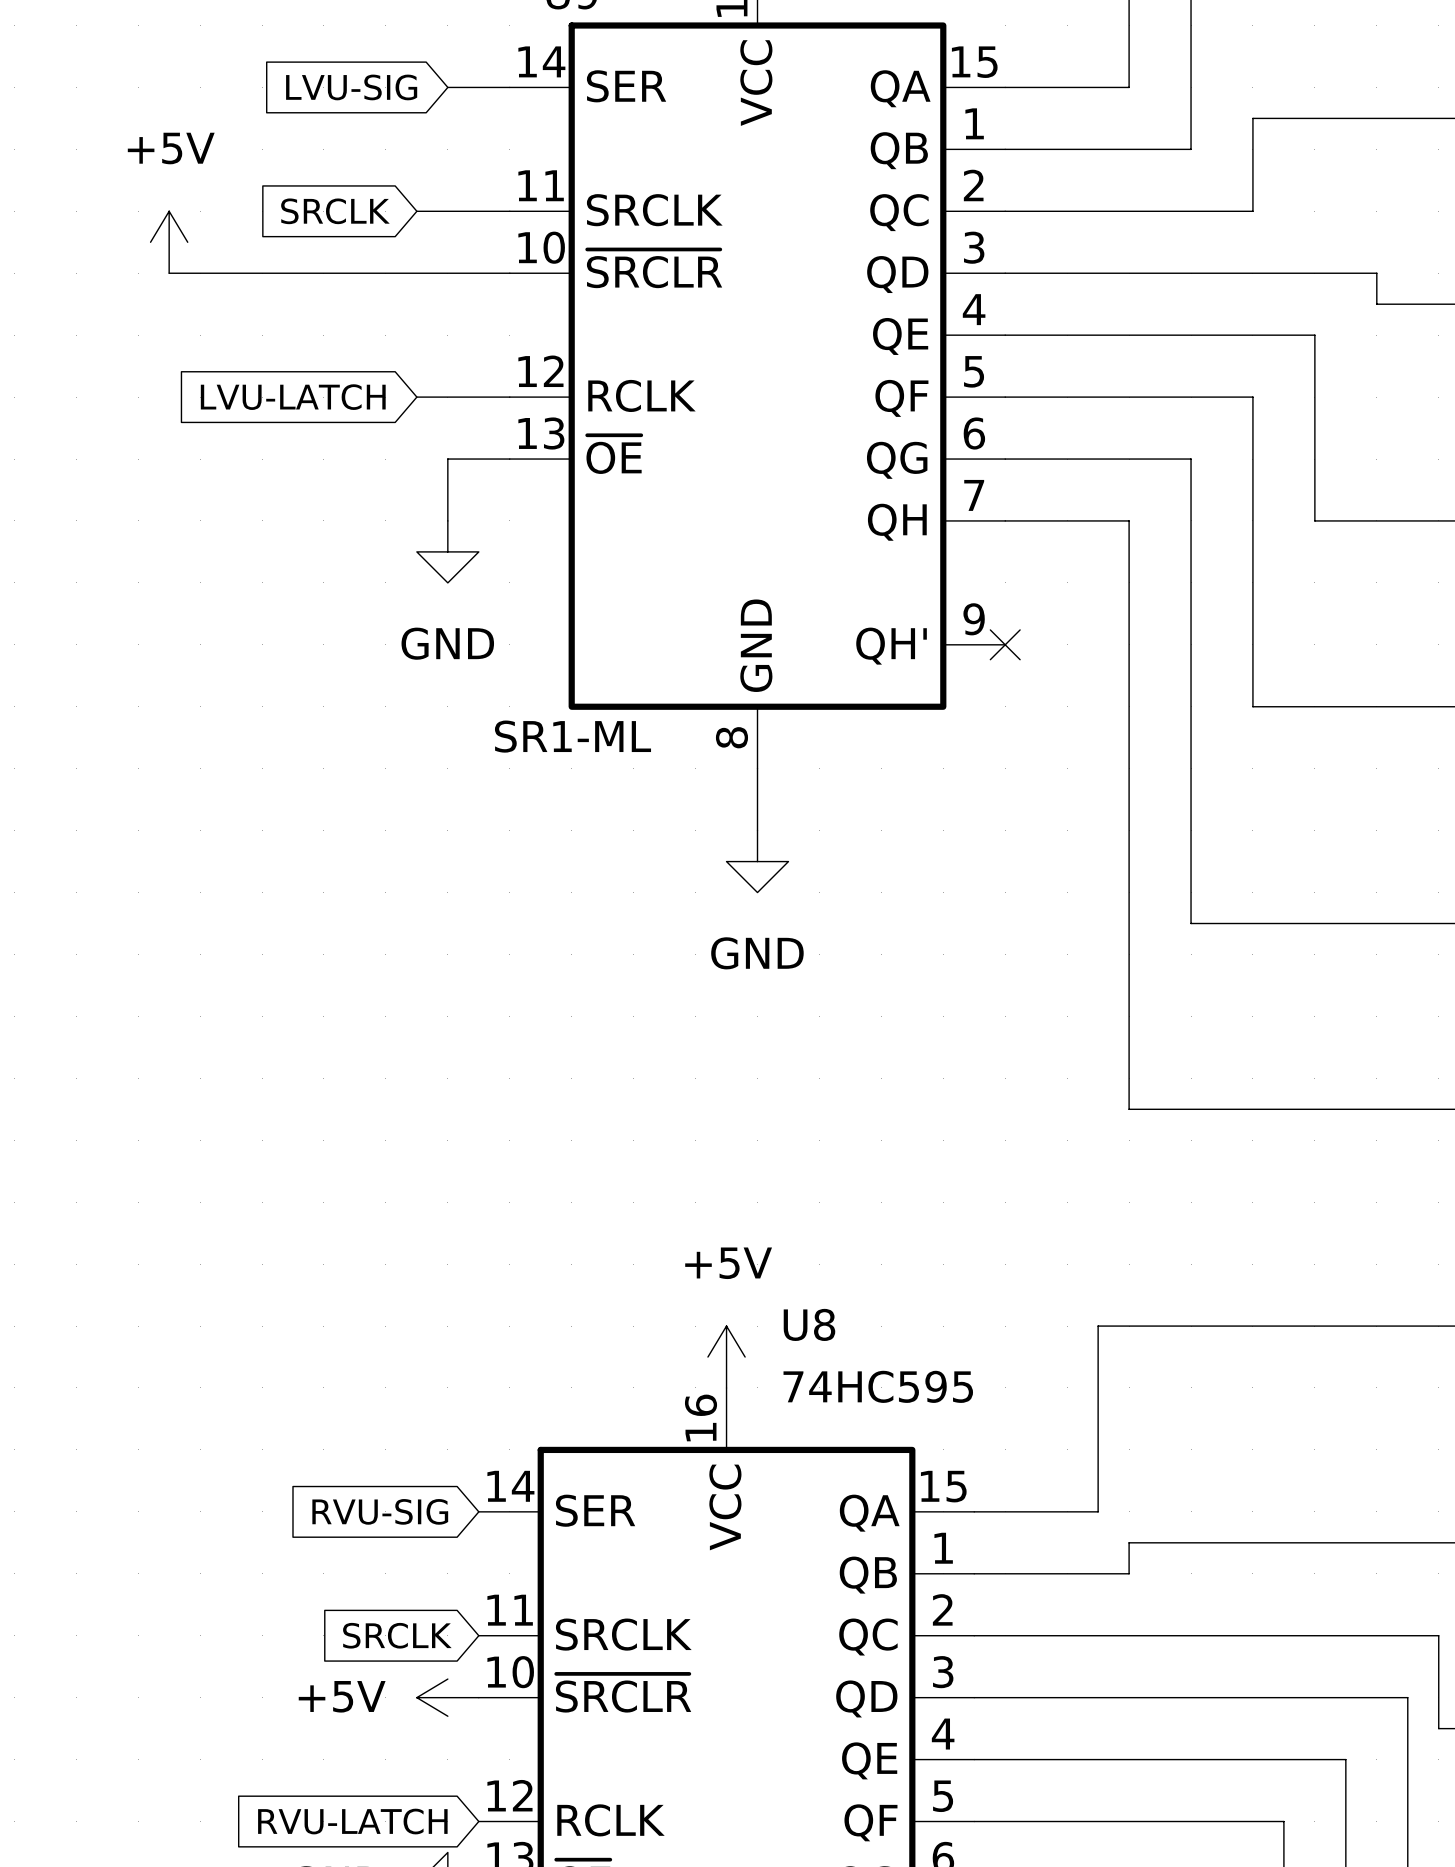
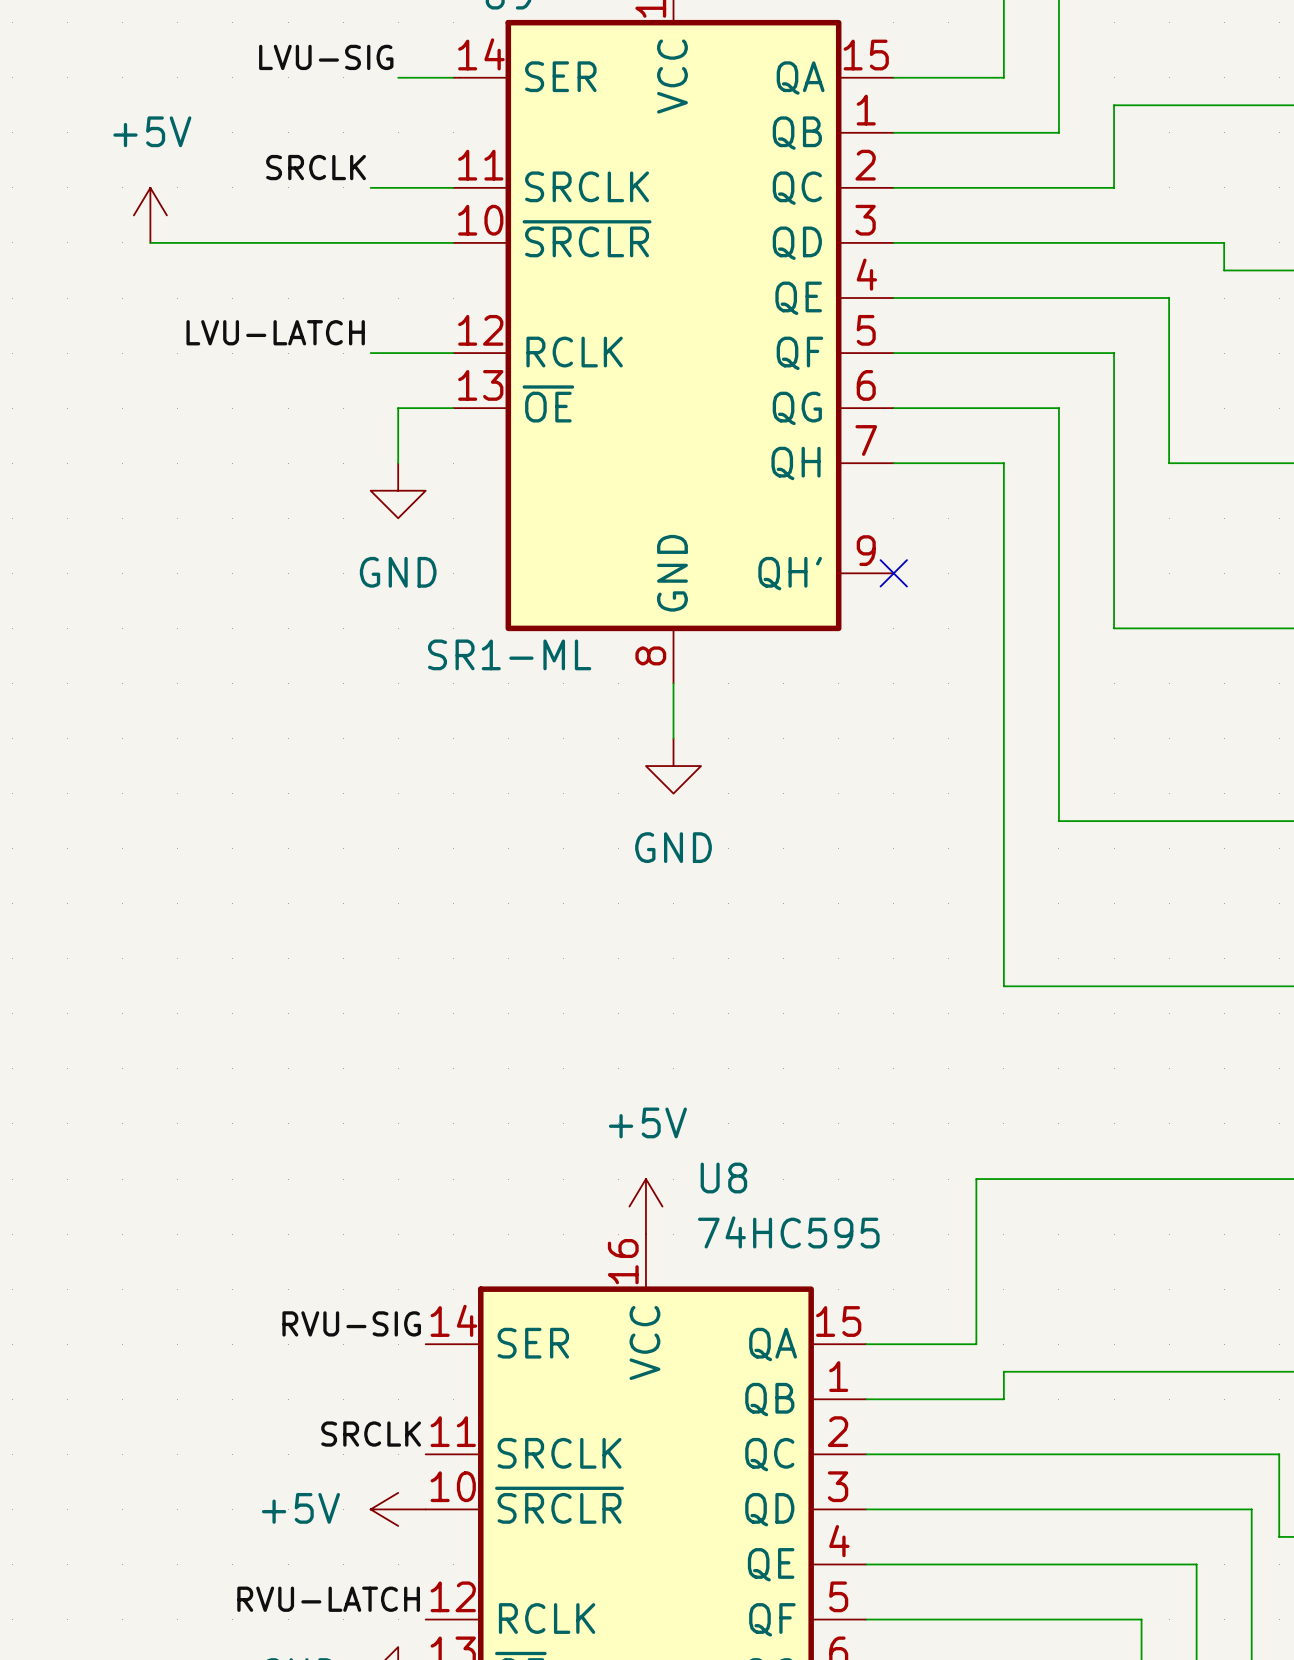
label: none -> LVU-SIG (326, 57)
global label: LVU-SIG (351, 87) -> none
label: none -> SRCLK (316, 167)
global label: SRCLK (335, 211) -> none
label: none -> LVU-LATCH (275, 332)
global label: LVU-LATCH (293, 397) -> none
label: none -> RVU-SIG (351, 1323)
global label: RVU-SIG (380, 1511) -> none
label: none -> SRCLK (371, 1434)
global label: SRCLK (397, 1635) -> none
label: none -> RVU-LATCH (328, 1599)
global label: RVU-LATCH (352, 1821) -> none

